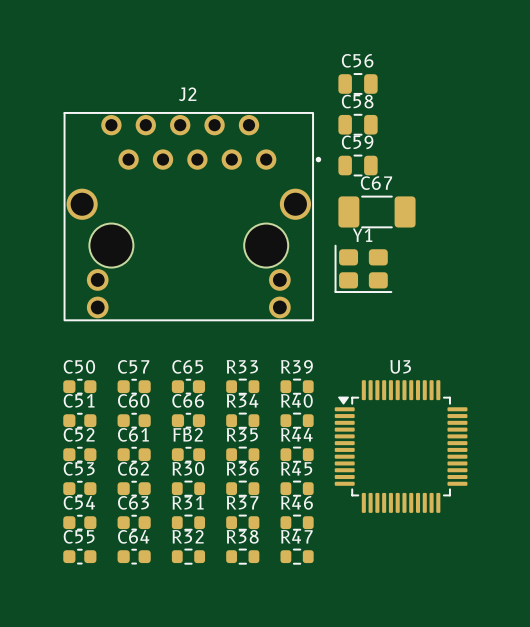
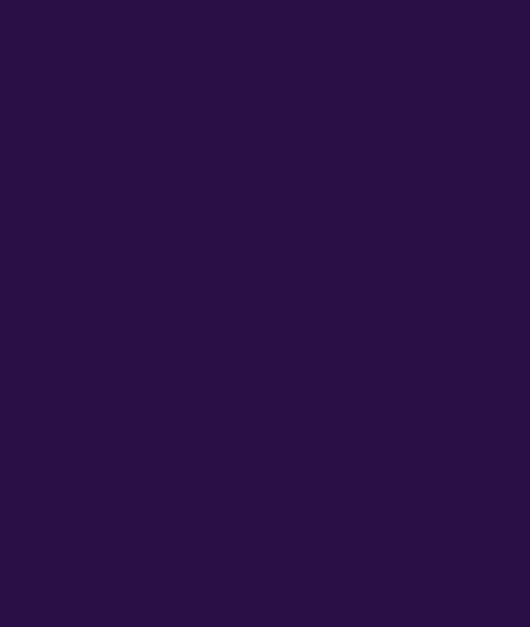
C56: (358, 83) -> none
C58: (358, 124) -> none
C59: (358, 165) -> none
C67: (376, 211) -> none
J2: (192, 216) -> none
Y1: (363, 268) -> none
C50: (79, 386) -> none
C57: (134, 386) -> none
C65: (188, 386) -> none
R33: (242, 386) -> none
R39: (297, 386) -> none
C51: (79, 420) -> none
C60: (134, 420) -> none
C66: (188, 420) -> none
R34: (242, 420) -> none
R40: (297, 420) -> none
U3: (401, 446) -> none
C52: (79, 454) -> none
C61: (134, 454) -> none
FB2: (188, 454) -> none
R35: (242, 454) -> none
R44: (297, 454) -> none
C53: (79, 488) -> none
C62: (134, 488) -> none
R30: (188, 488) -> none
R36: (242, 488) -> none
R45: (297, 488) -> none
C54: (79, 522) -> none
C63: (134, 522) -> none
R31: (188, 522) -> none
R37: (242, 522) -> none
R46: (297, 522) -> none
C55: (79, 556) -> none
C64: (134, 556) -> none
R32: (188, 556) -> none
R38: (242, 556) -> none
R47: (297, 556) -> none

